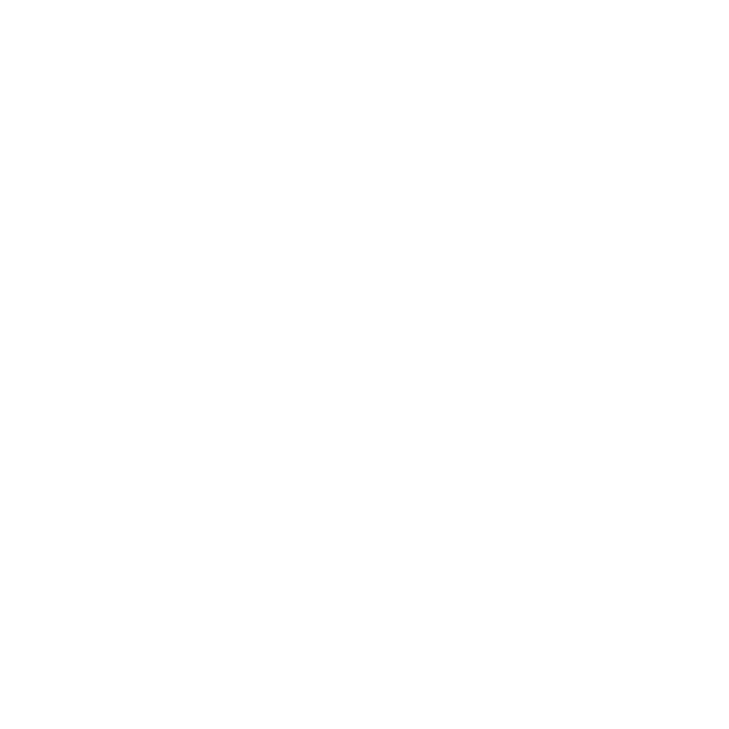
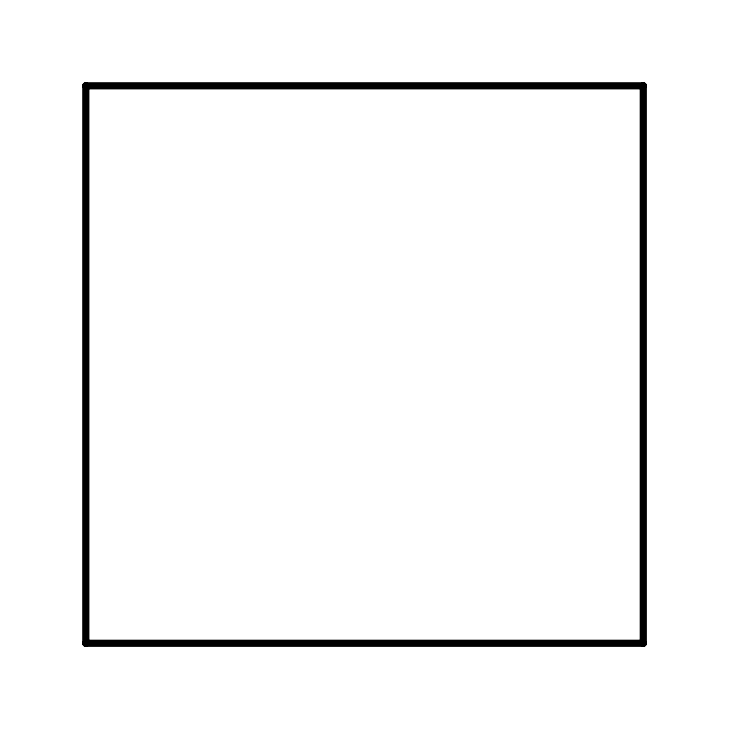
board edge: none -> (643, 85) (85, 85) (85, 643) (643, 643) (643, 85)

